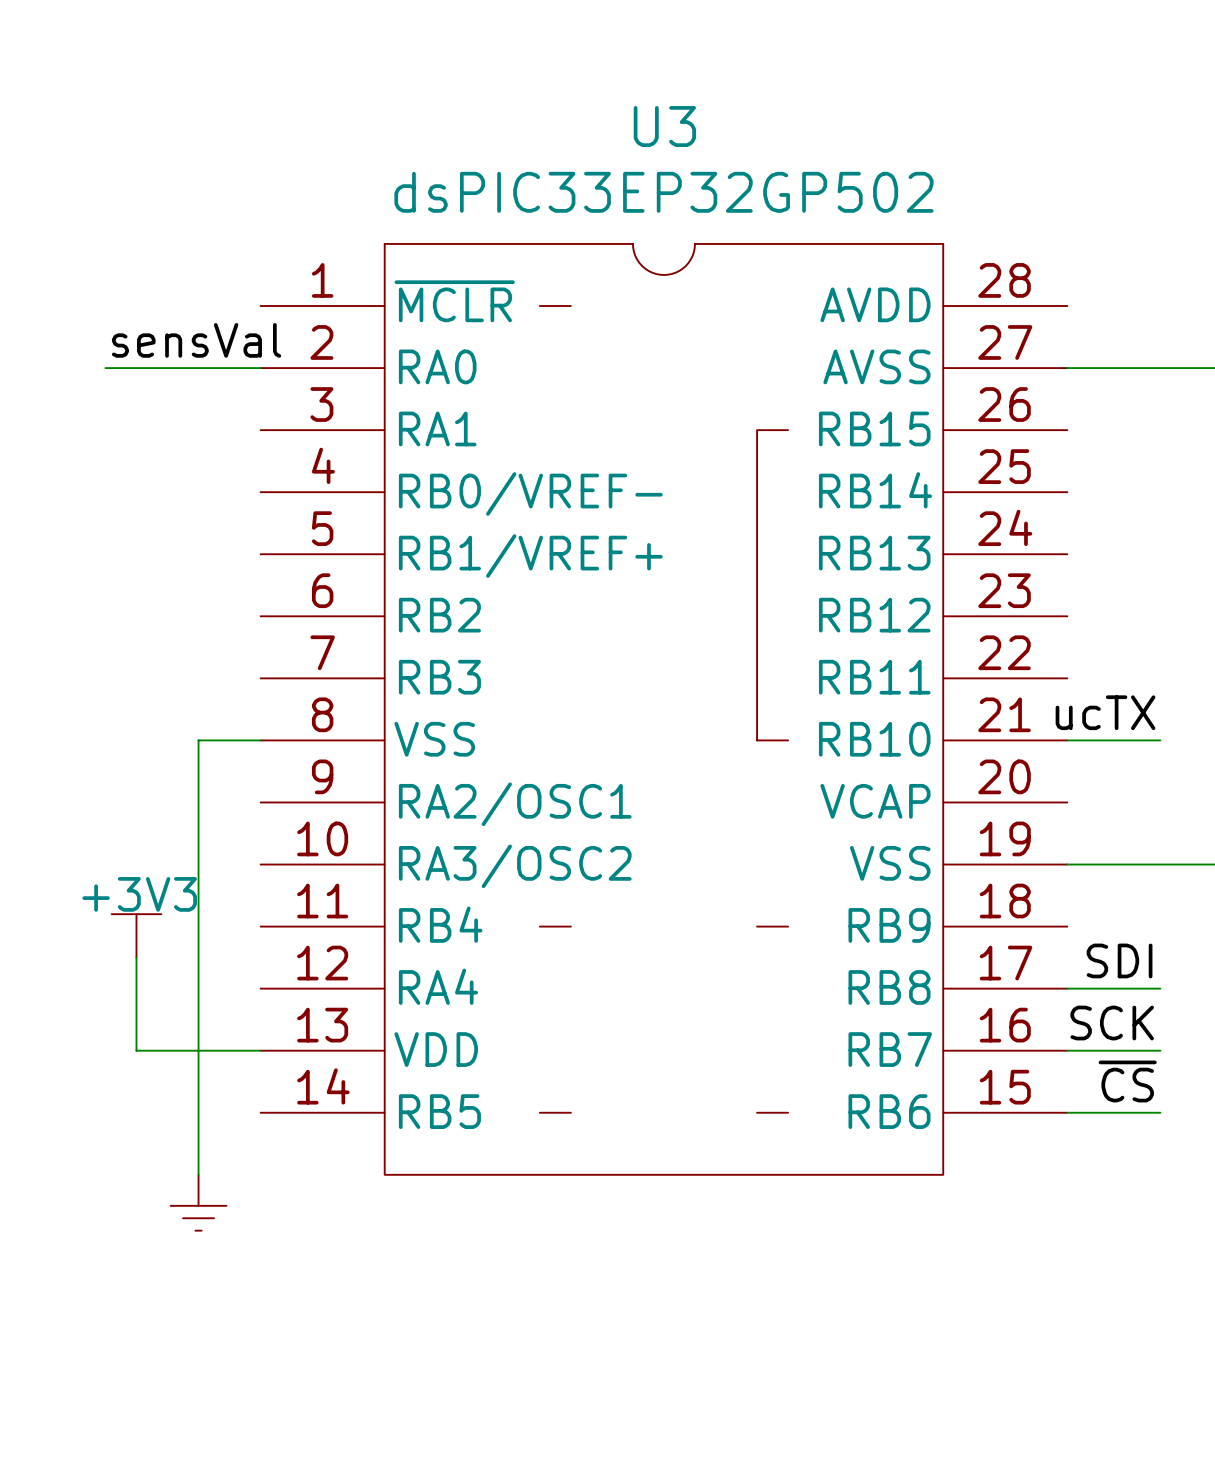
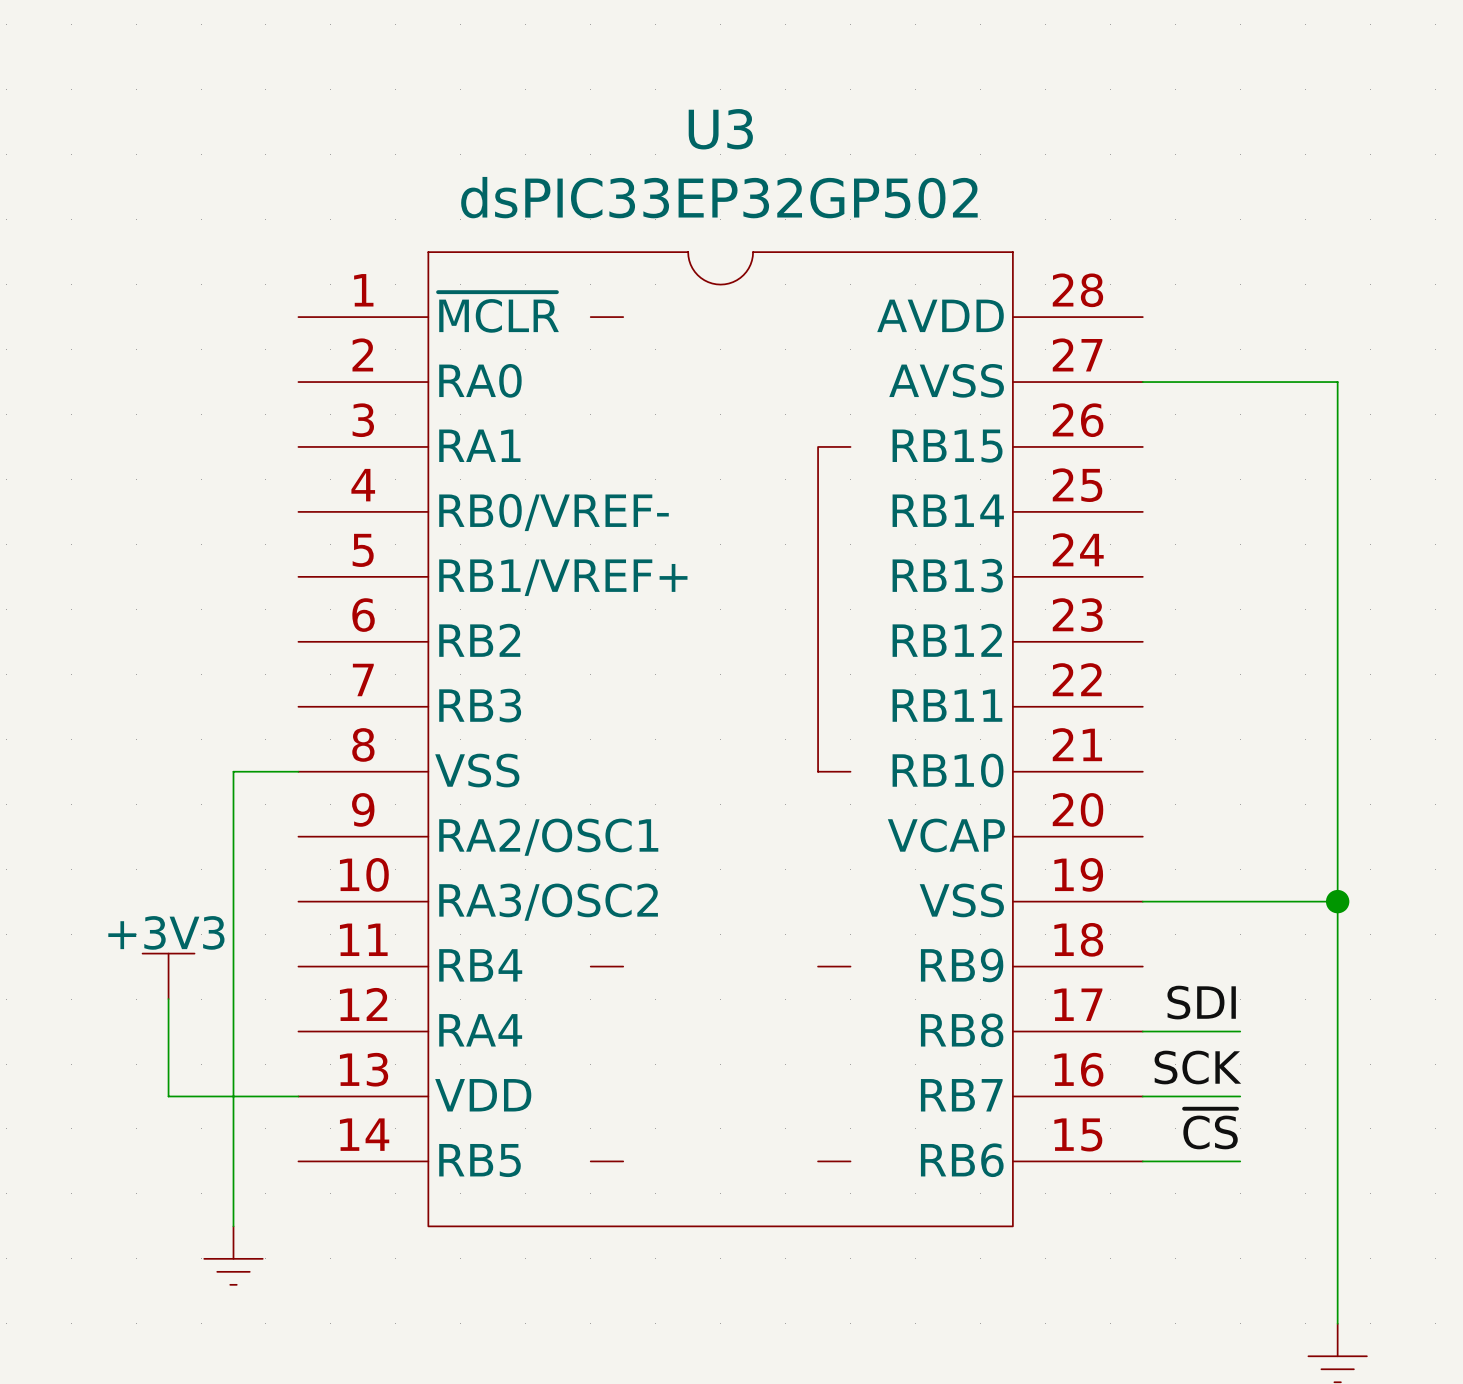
label: sensVal (196, 340) -> none
wire: (105, 368) (260, 368) -> none
label: ucTX (1105, 712) -> none
wire: (1067, 740) (1160, 740) -> none

